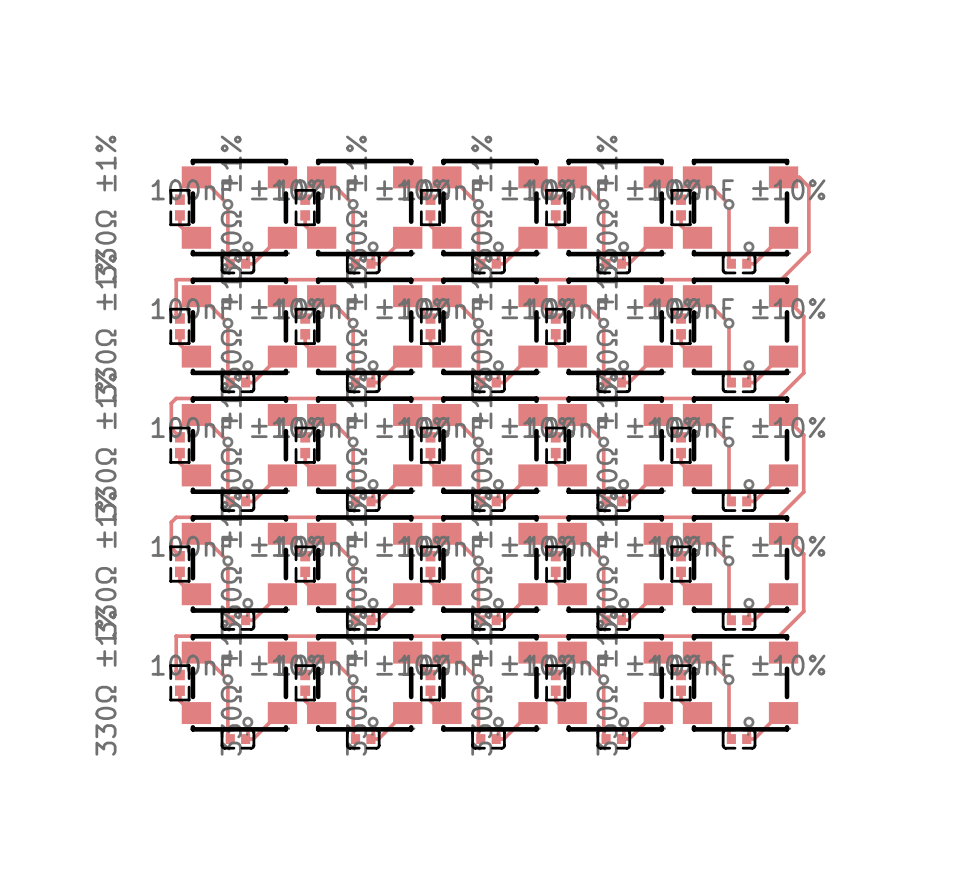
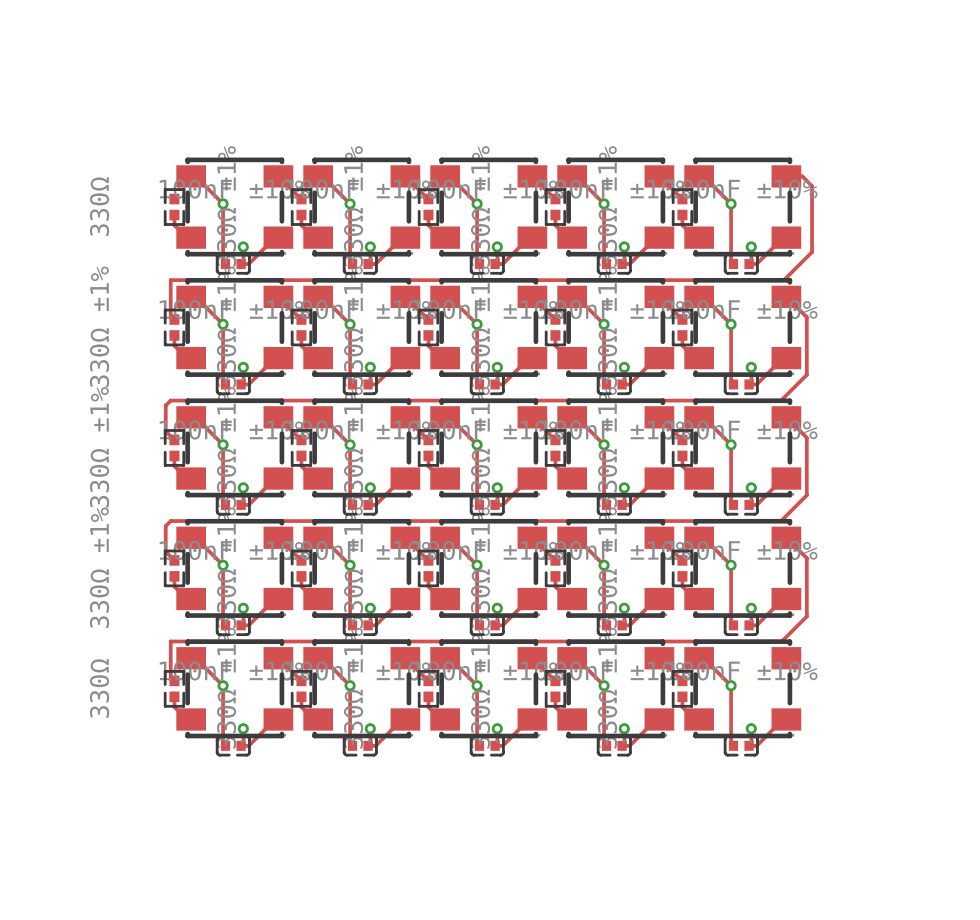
part value: 330Ω ±1% (106, 207) -> 330Ω (99, 206)
part value: 330Ω ±1% (106, 683) -> 330Ω (99, 688)

